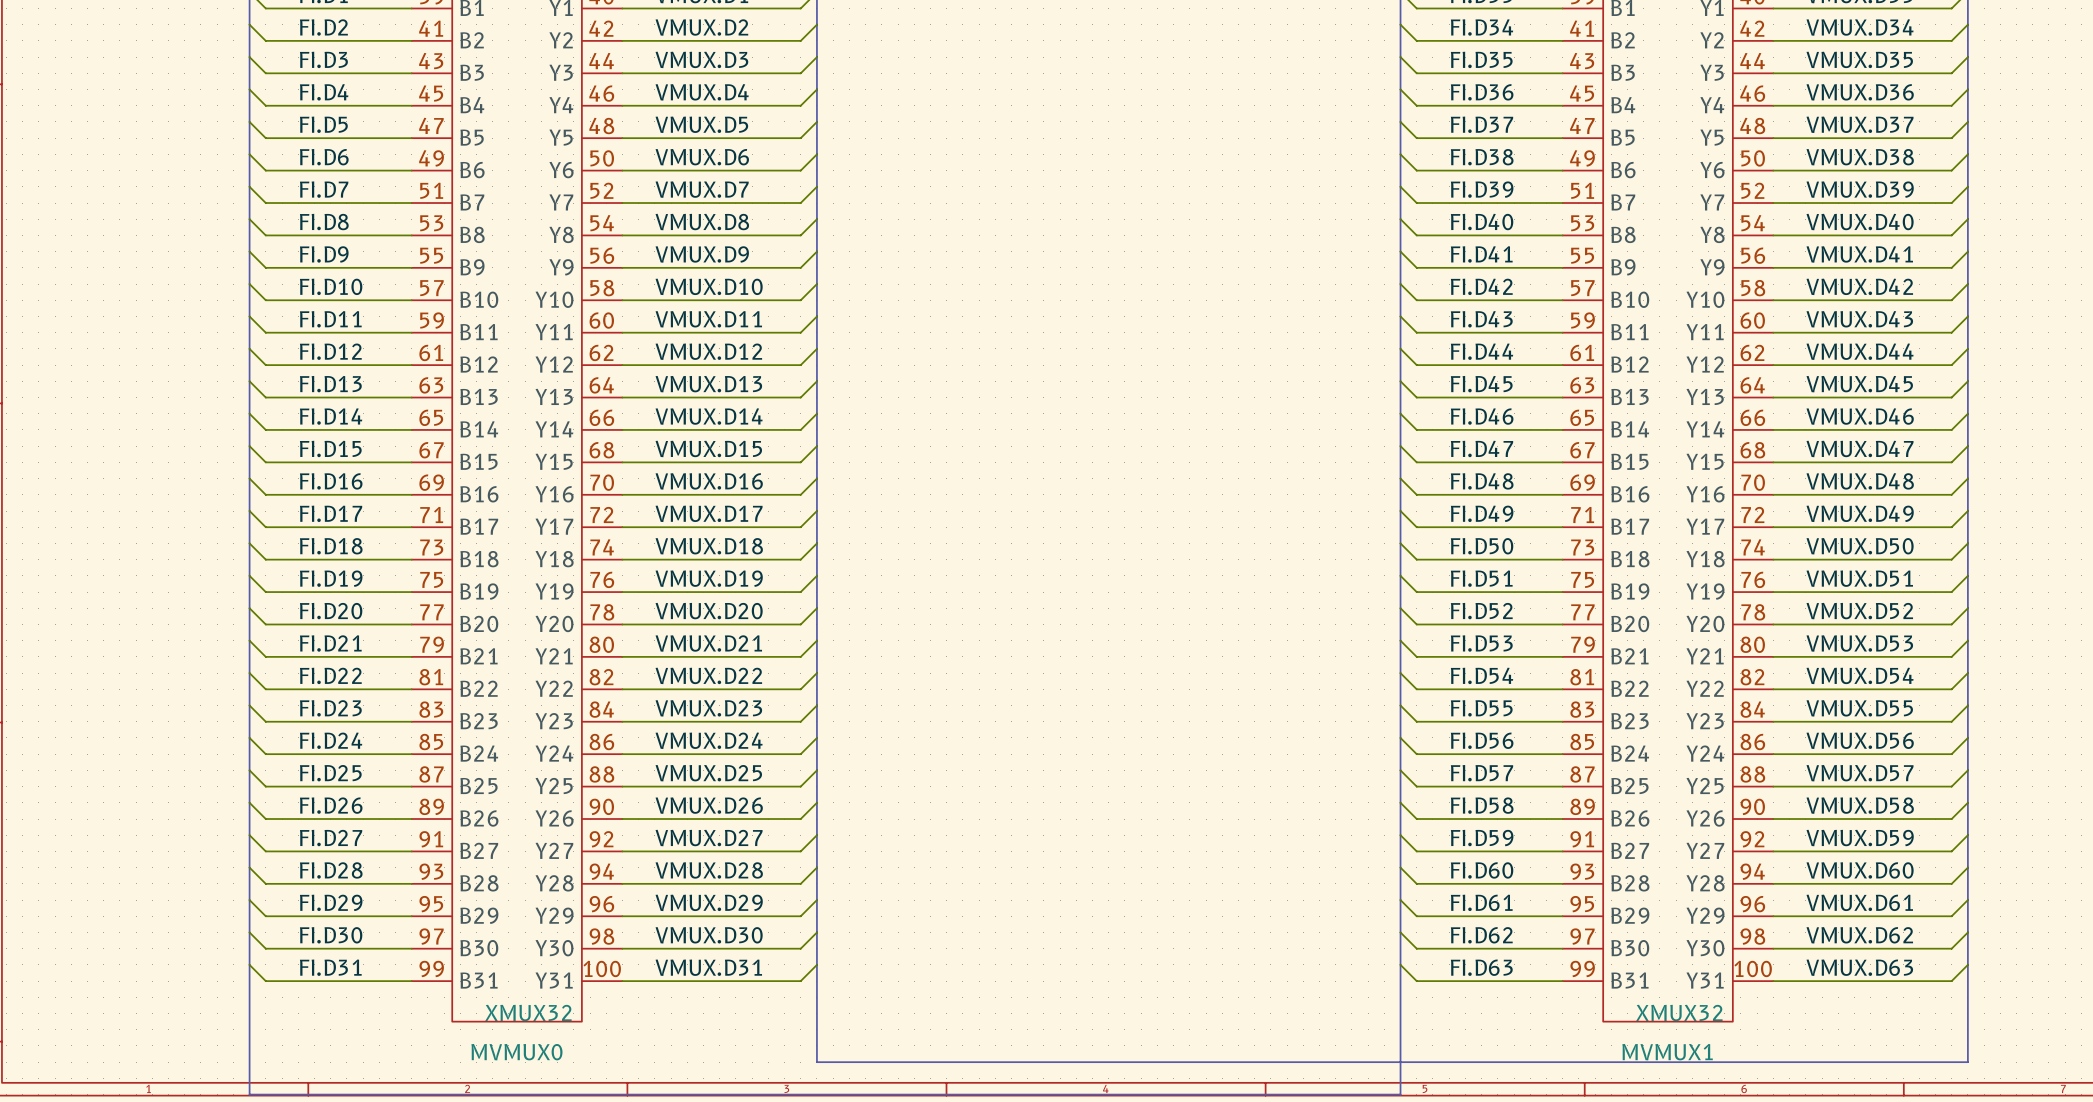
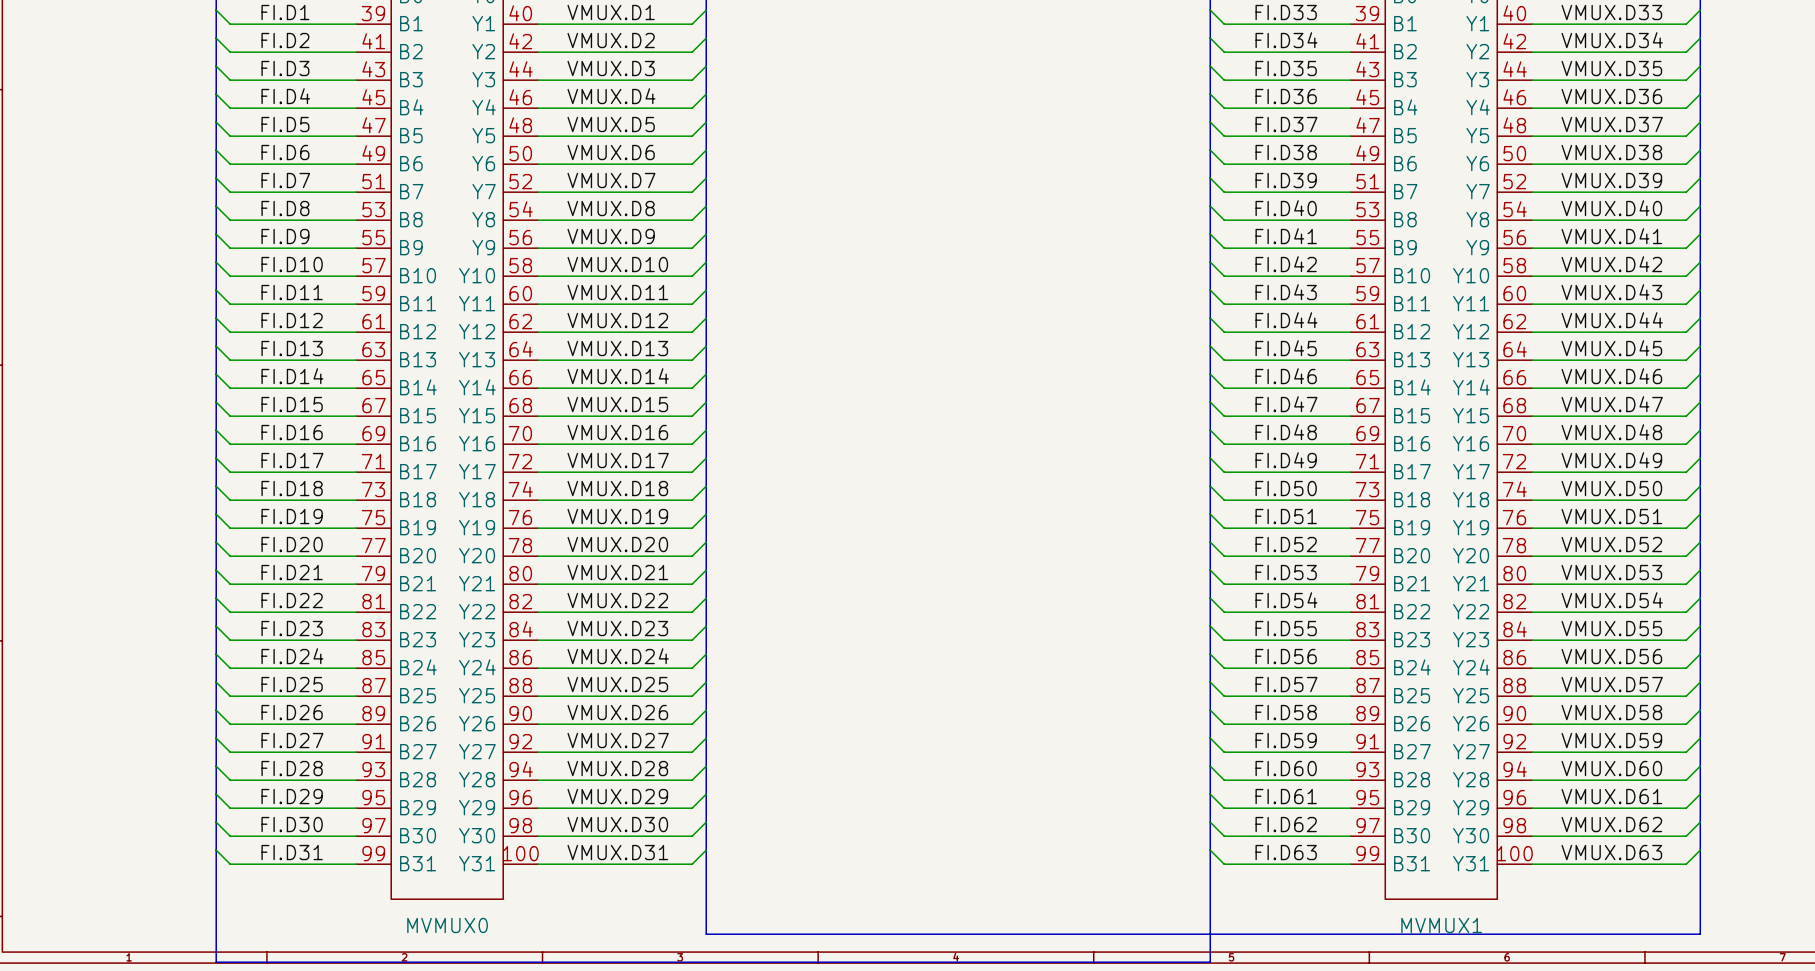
part value: XMUX32 (528, 1013) -> none
part value: XMUX32 (1679, 1013) -> none

